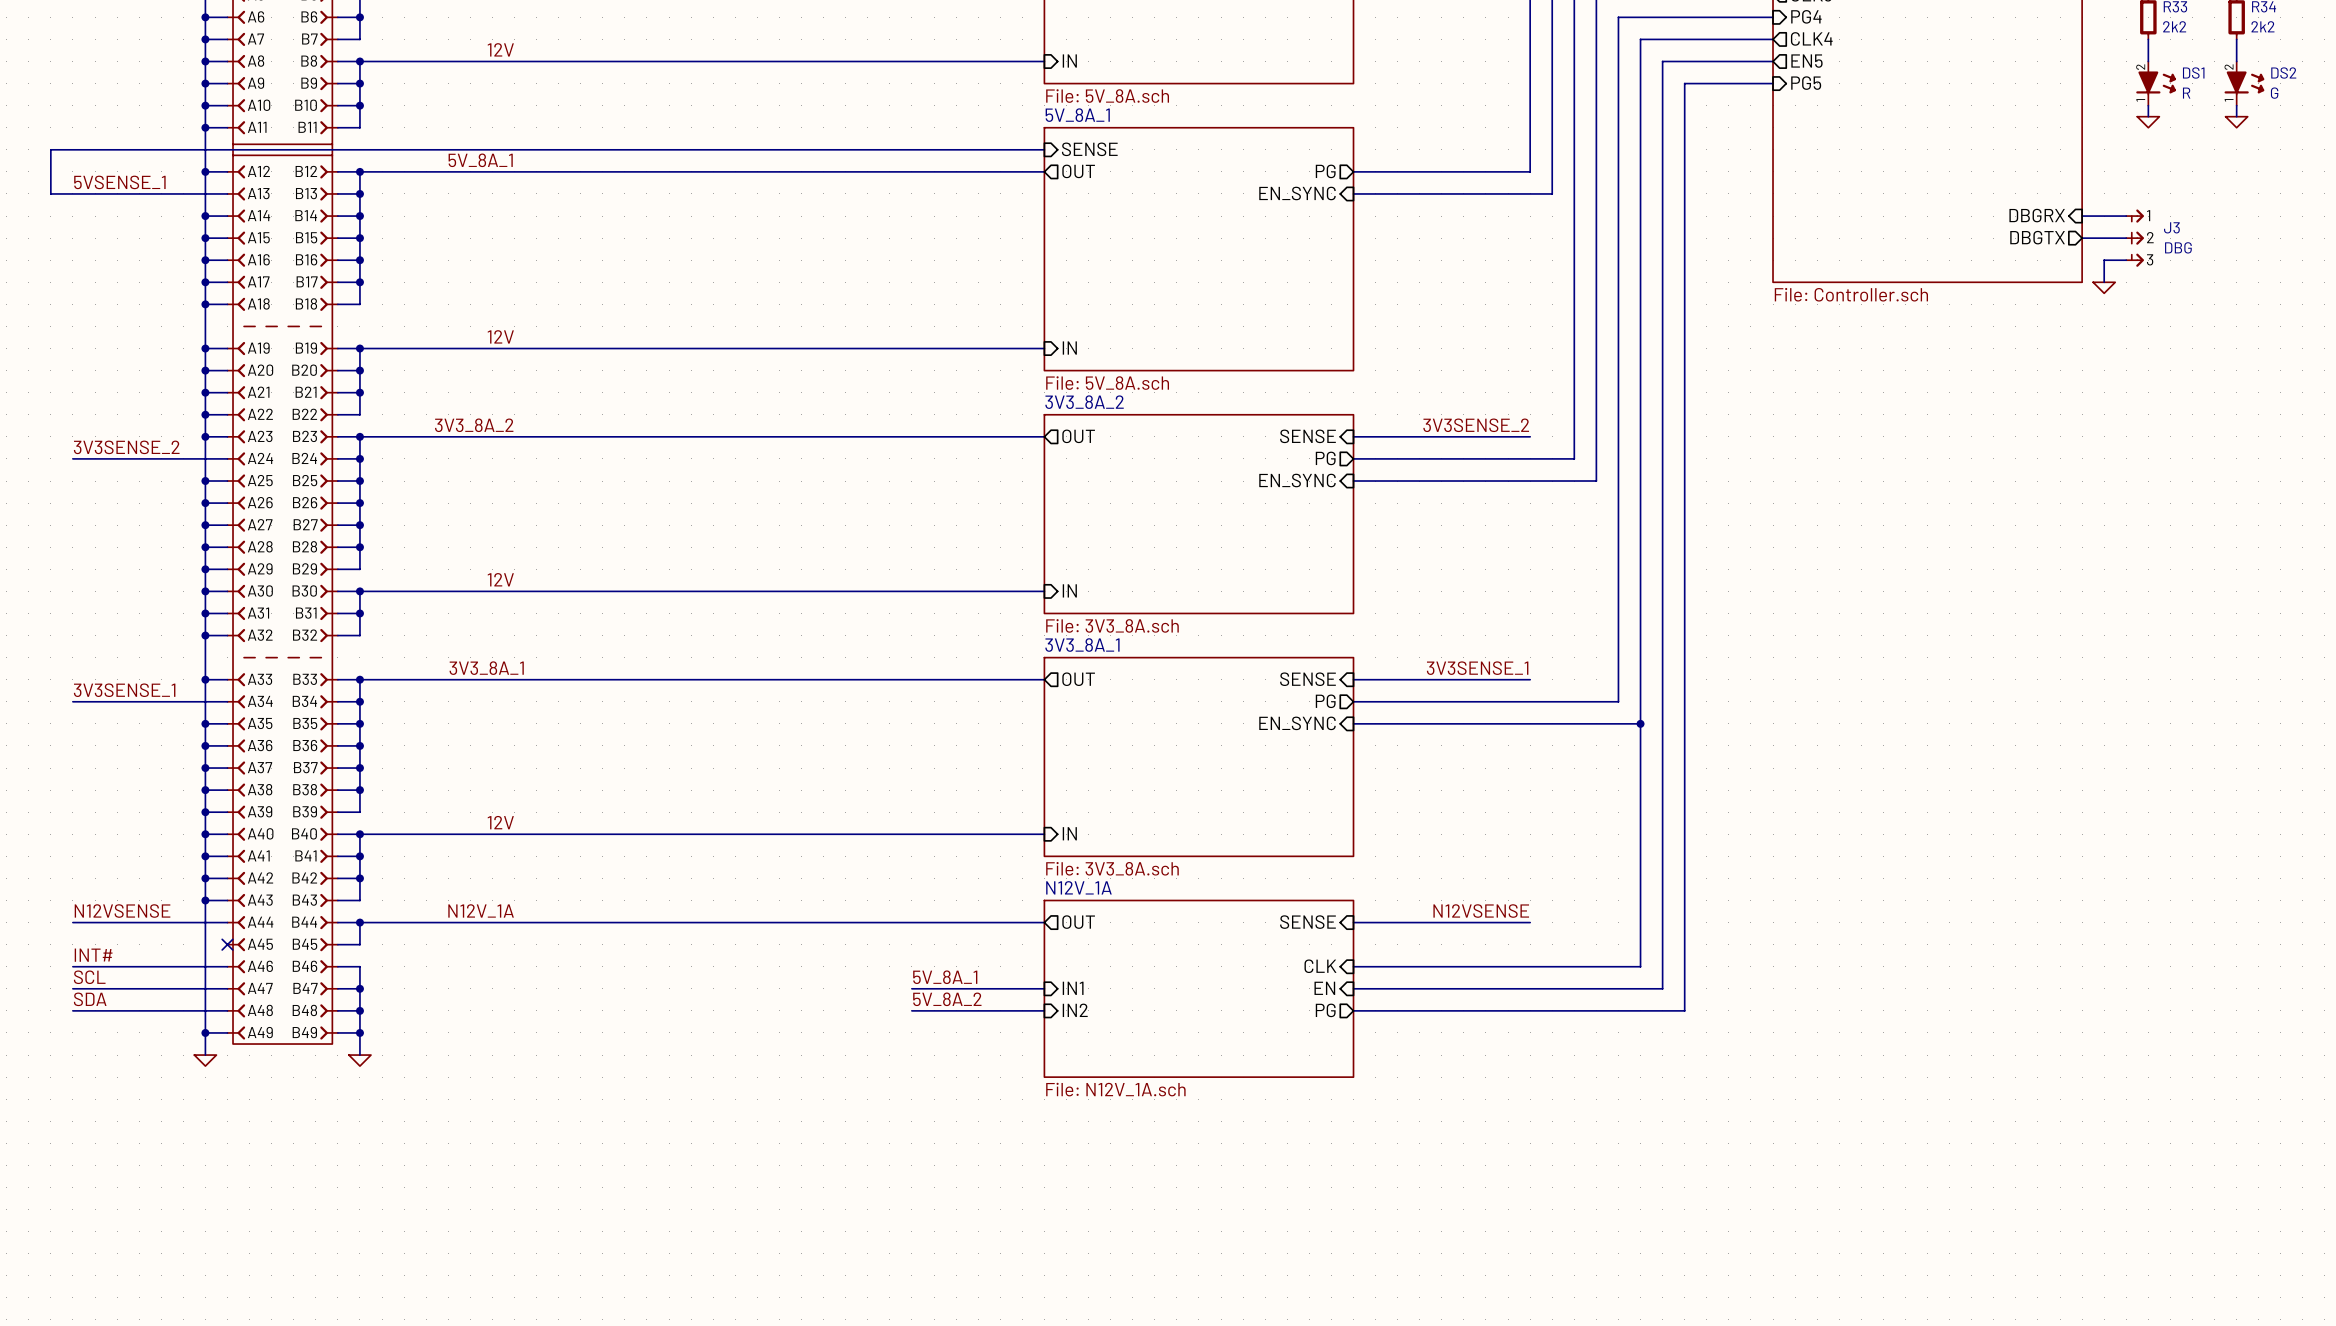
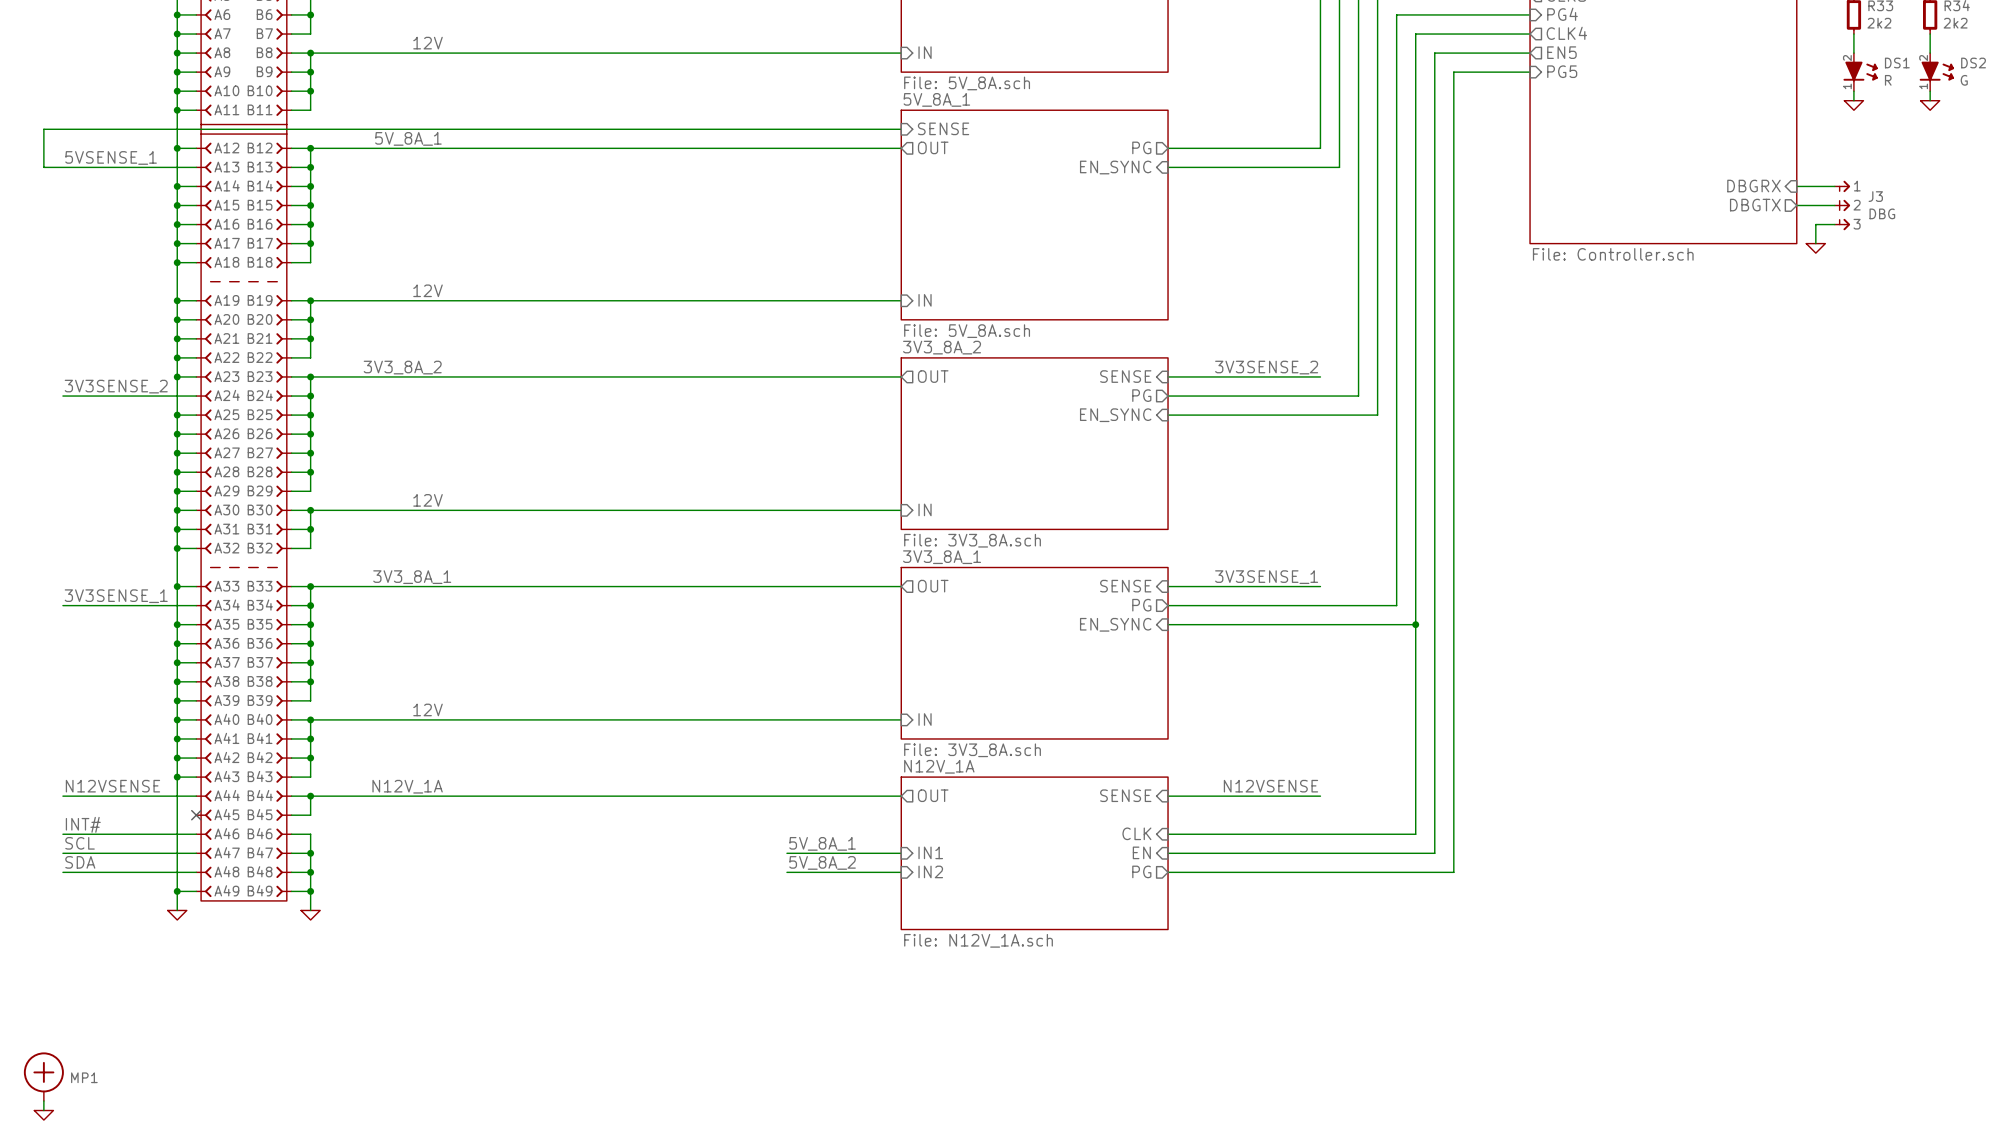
MP1: none -> (43, 1076)
wire: none -> (43, 1100) (43, 1110)
power symbol: none -> (43, 1115)

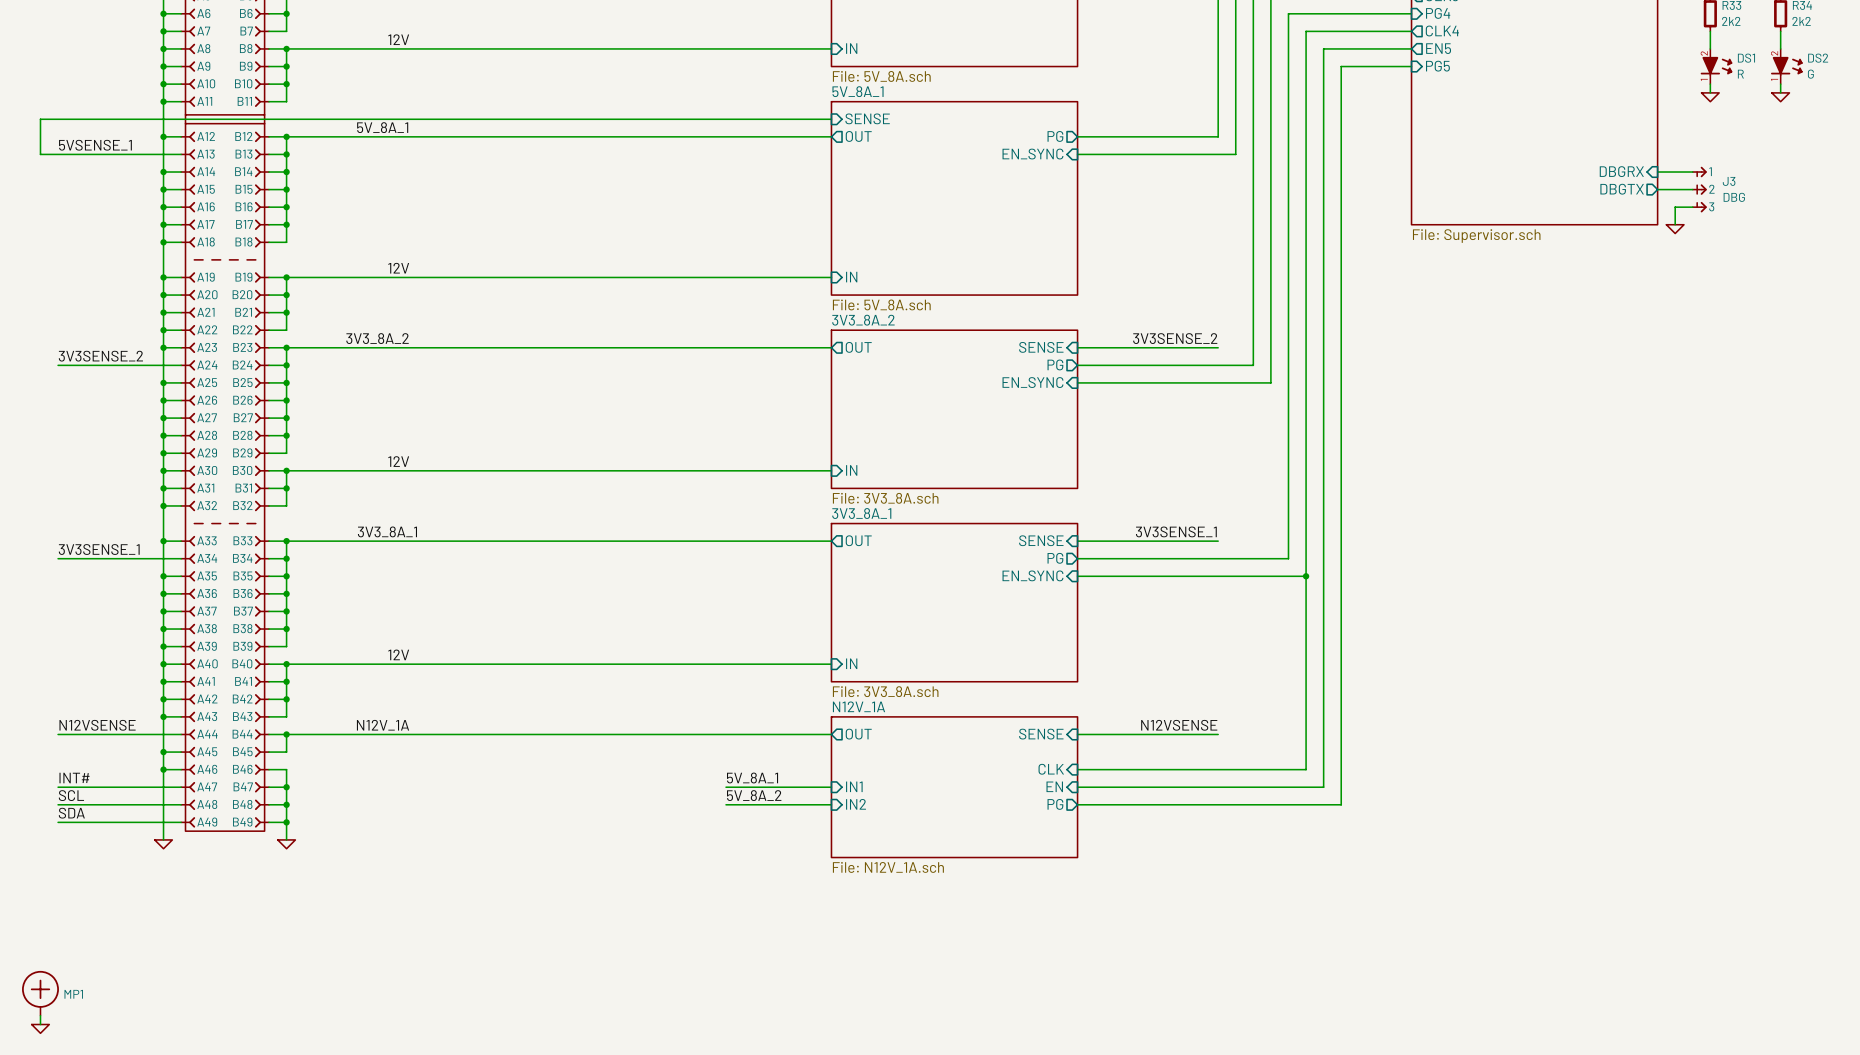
sheet value: File: Controller.sch (1613, 254) -> File: Supervisor.sch (1476, 236)
wire: none -> (163, 752) (181, 752)
junction: none -> (163, 752)
no-connect mark: (196, 815) -> none
label: INT# (83, 824) -> none
wire: (62, 834) (177, 834) -> (58, 822) (163, 822)
junction: none -> (163, 769)
label: SCL (80, 843) -> INT# (74, 778)
label: SDA (80, 862) -> SCL (71, 795)
label: none -> SDA (71, 813)
junction: (177, 891) -> none

